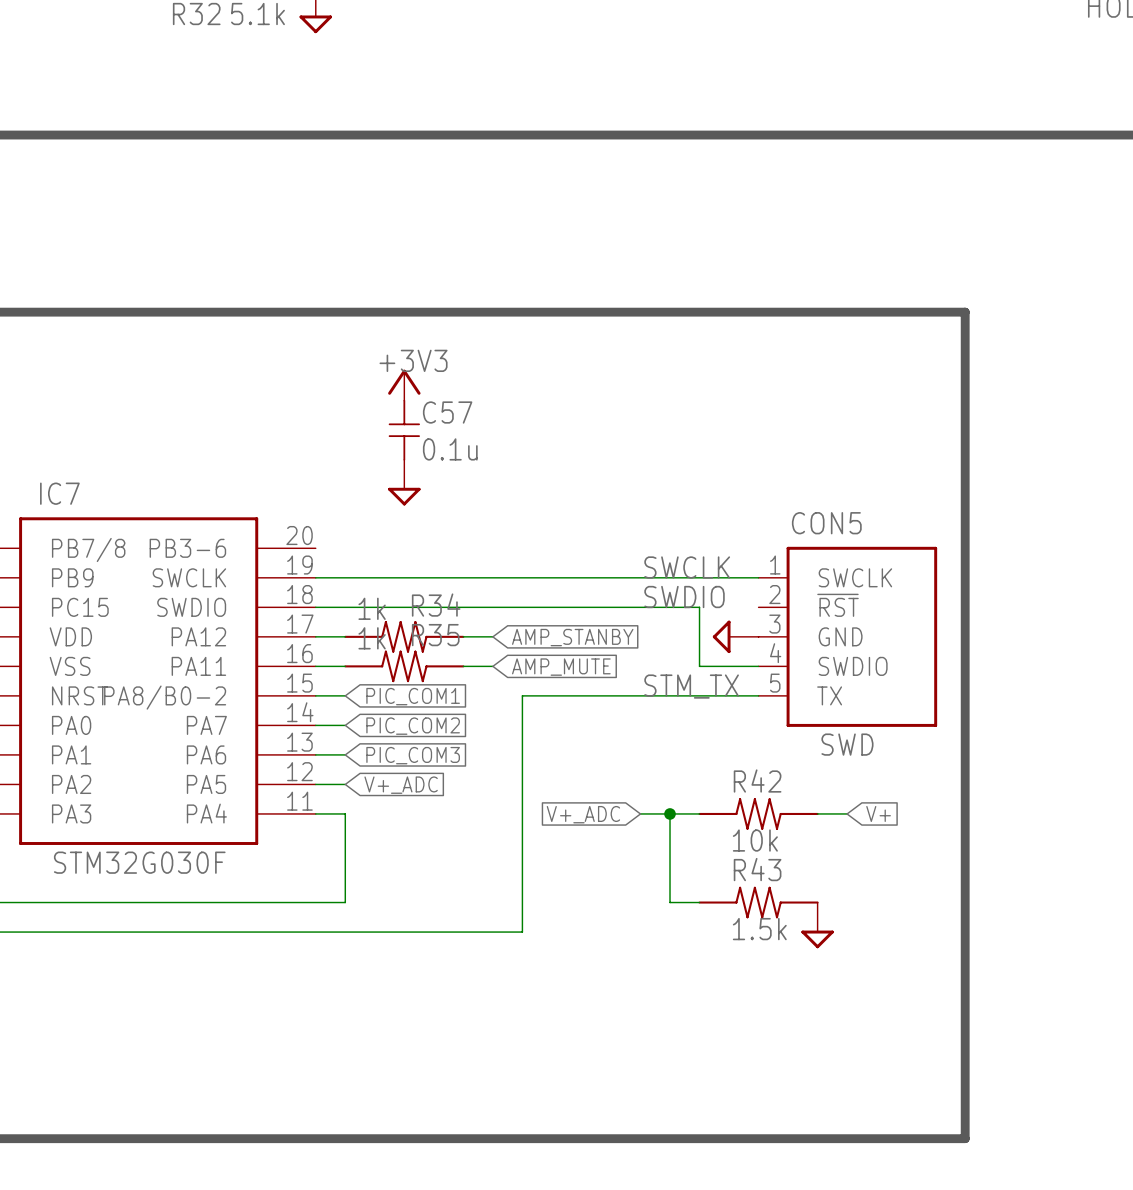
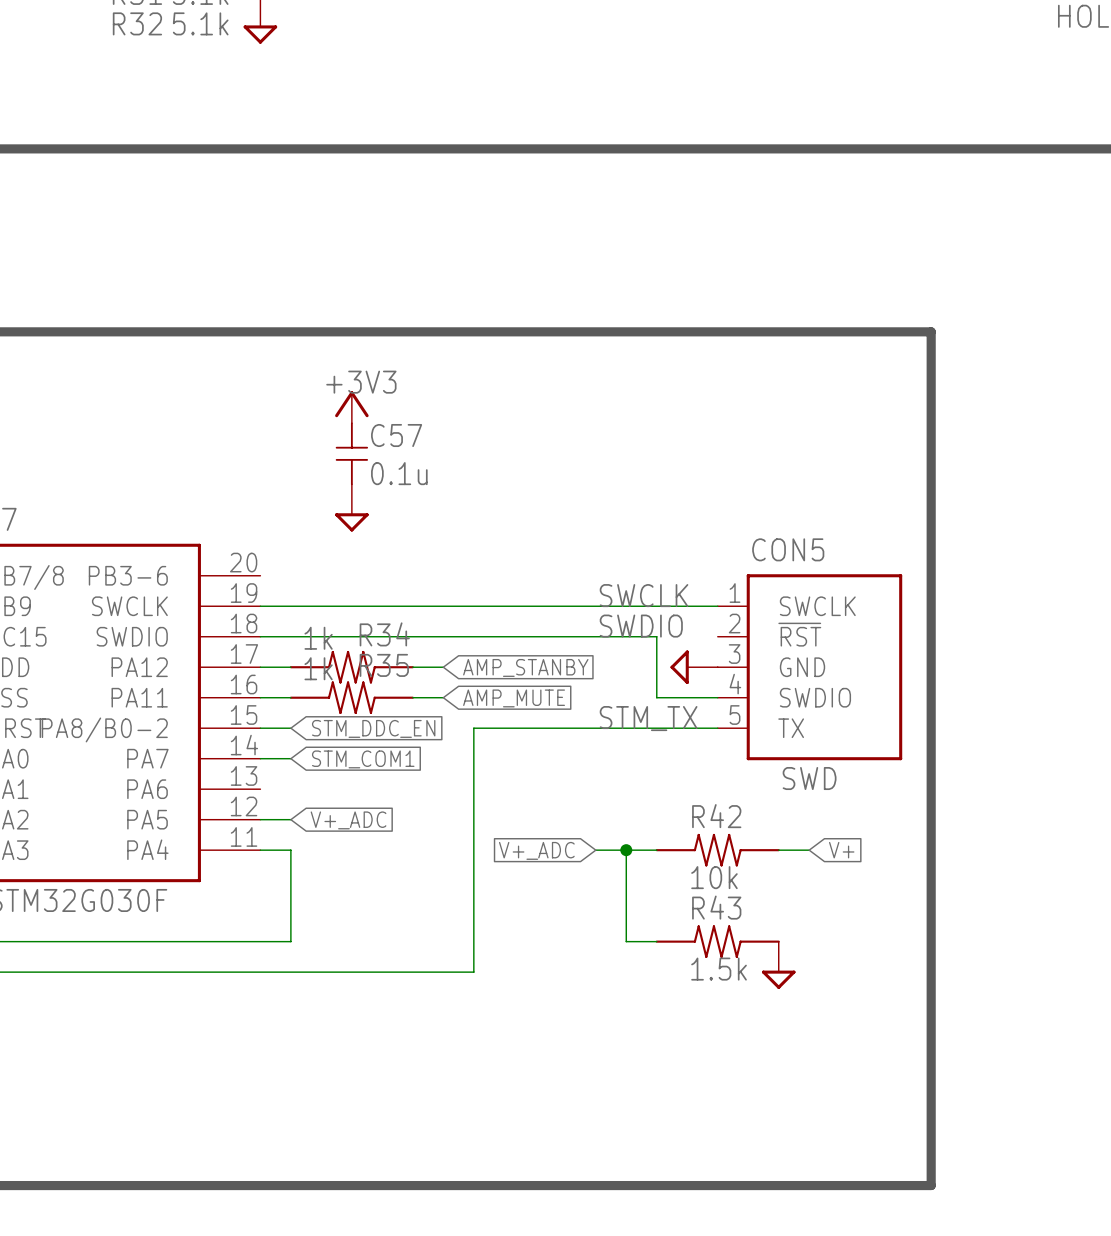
global label: PIC_COM1 (413, 696) -> STM_DDC_EN (373, 728)
global label: PIC_COM2 (413, 726) -> STM_COM1 (363, 759)
wire: (315, 754) (345, 754) -> none
global label: PIC_COM3 (413, 755) -> none

